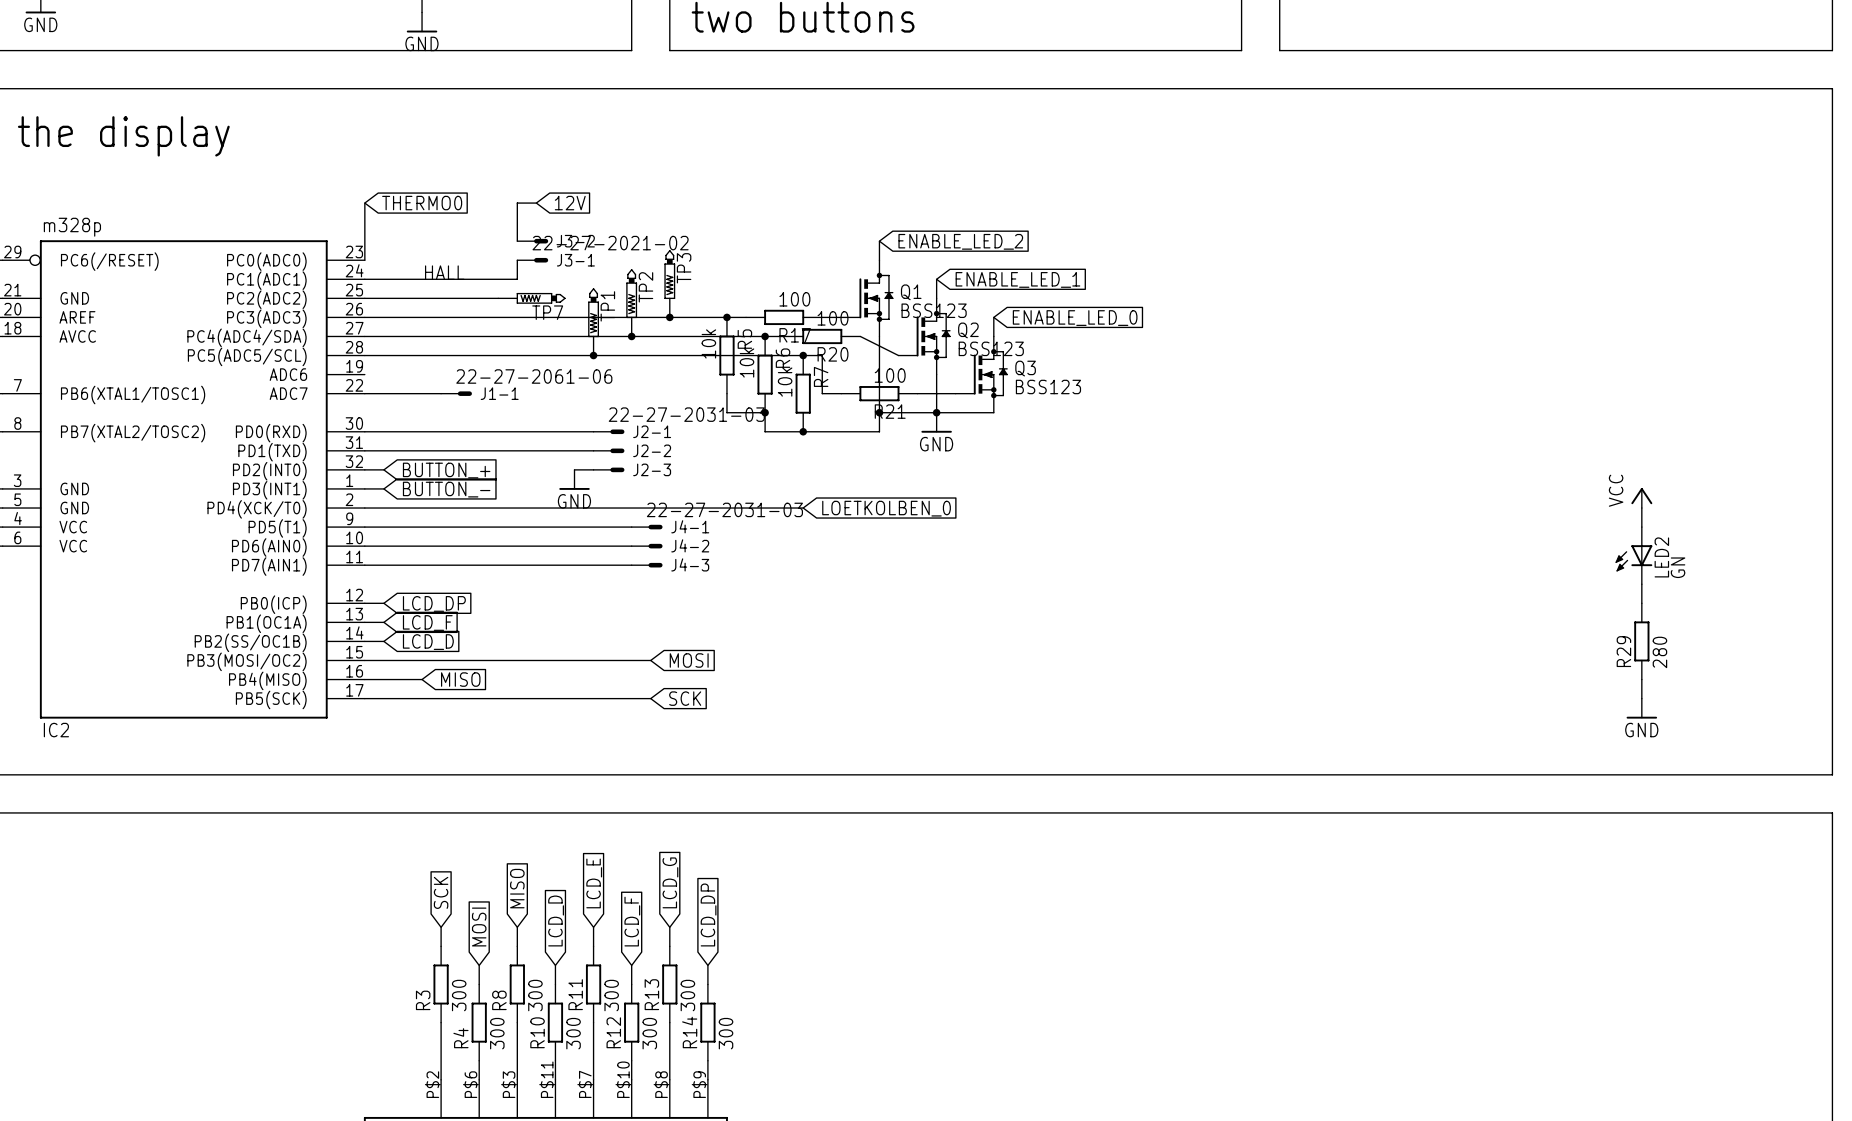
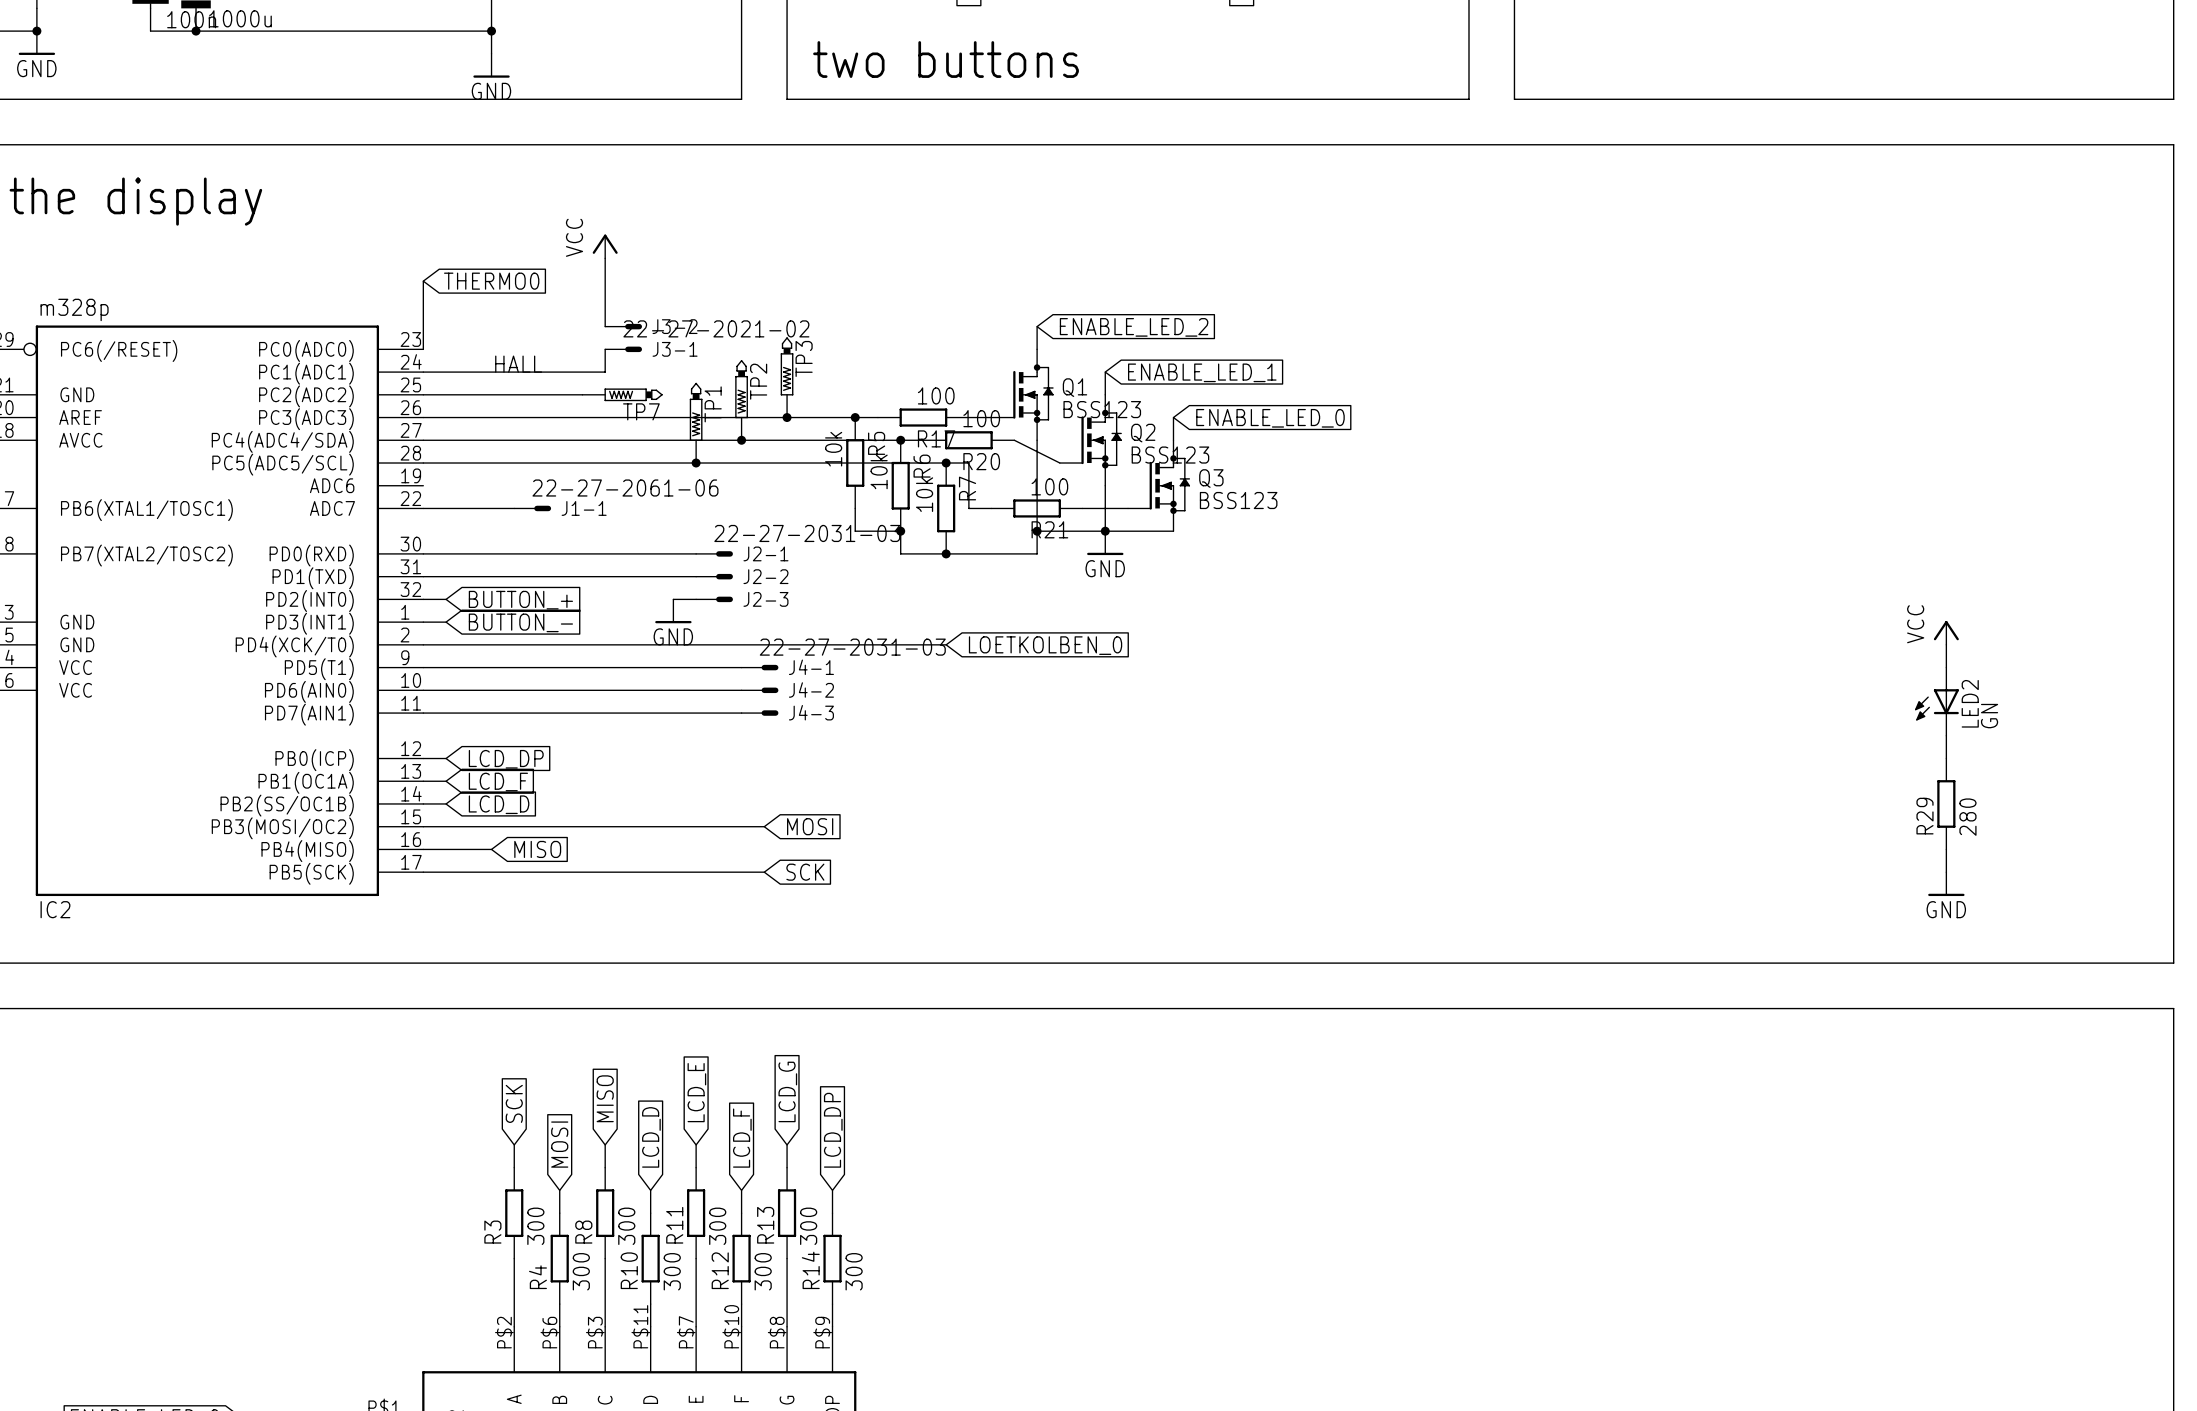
power symbol: none -> VCC (605, 246)
wire: (517, 203) (536, 203) -> (605, 281) (605, 258)
global label: 12V (570, 203) -> none

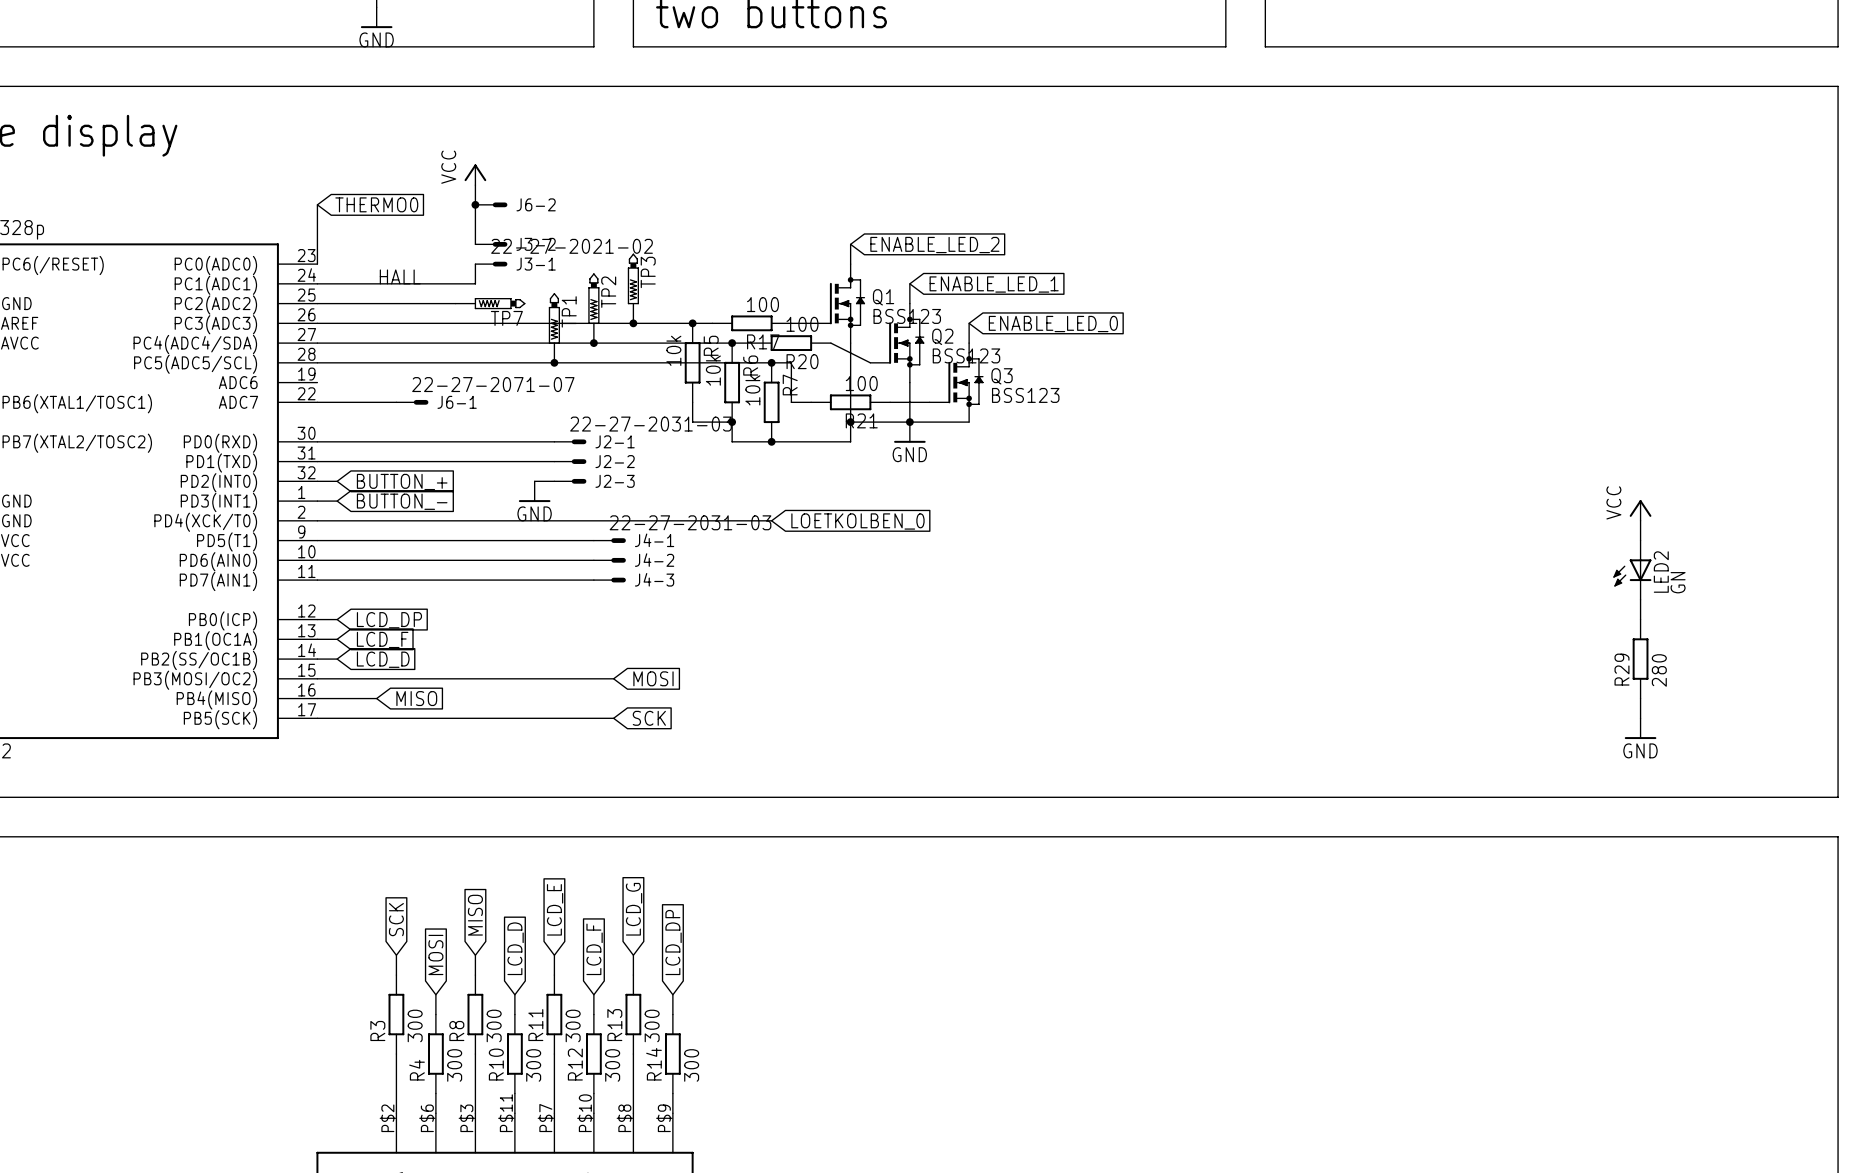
junction: none -> (475, 204)
J6-2: none -> (491, 204)
J1-1 value: 22-27-2061-06 (625, 488) -> 22-27-2071-07 (493, 384)
J1-1 name: J1-1 (584, 508) -> J6-1 (457, 402)

